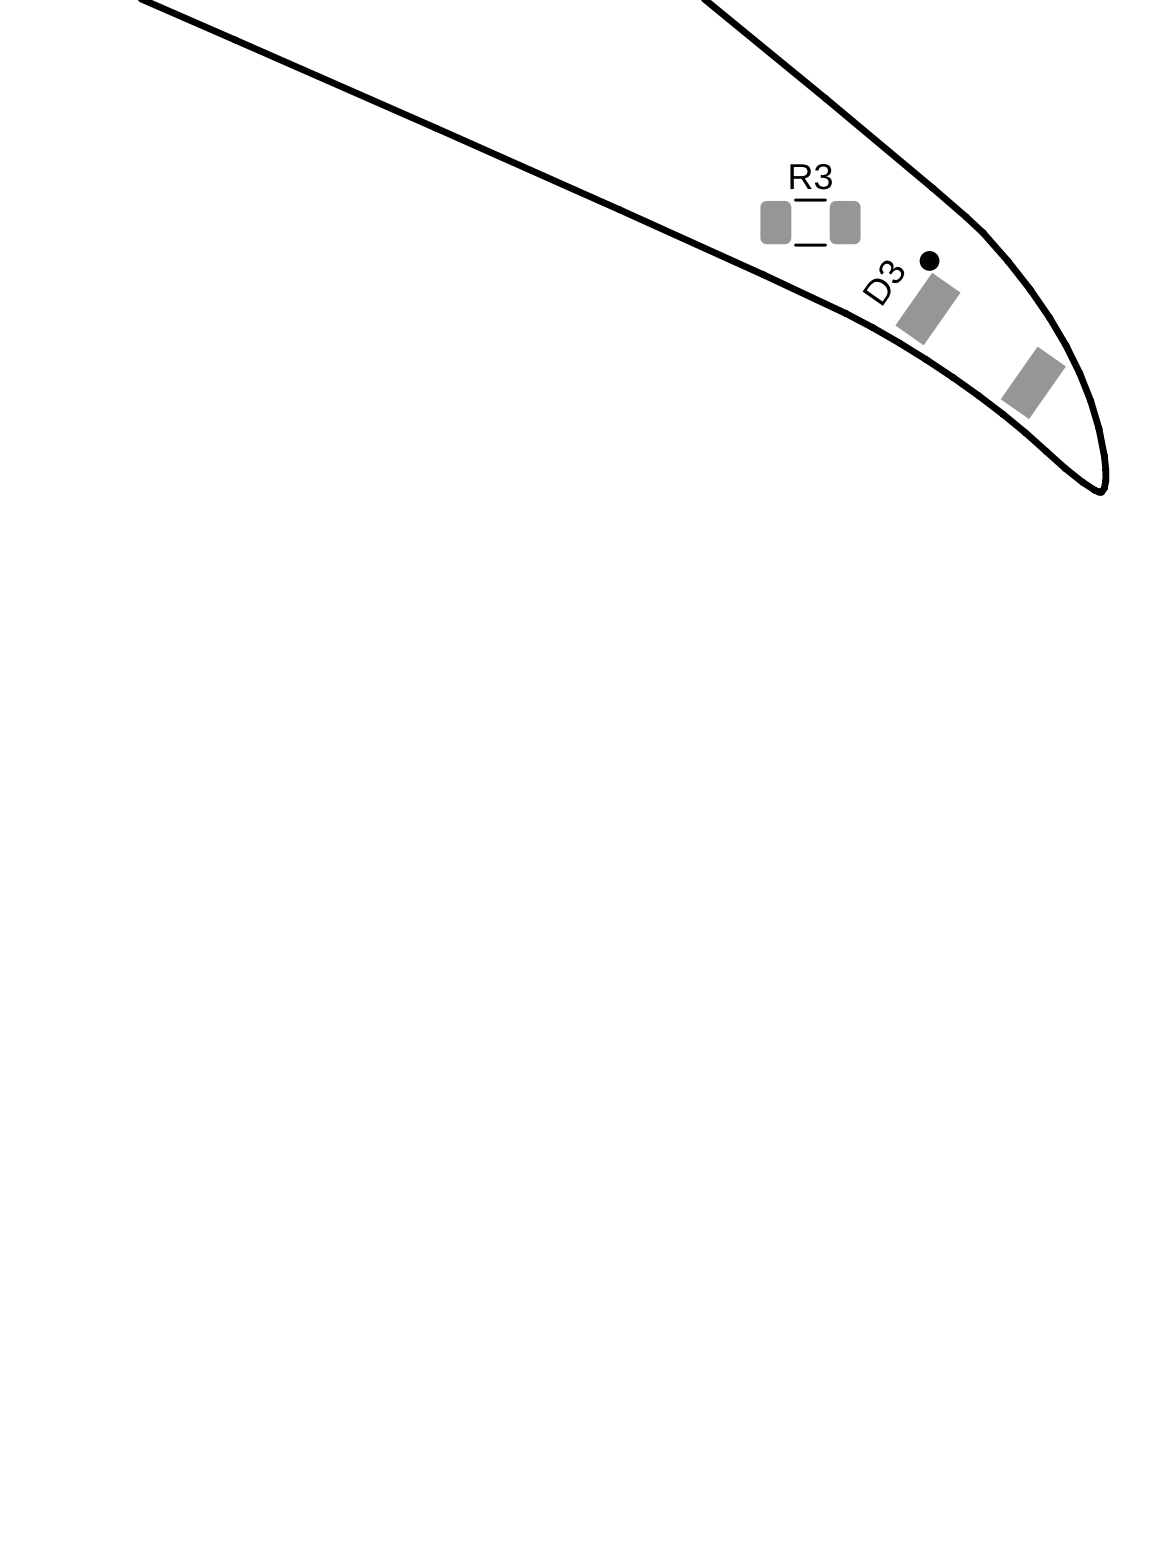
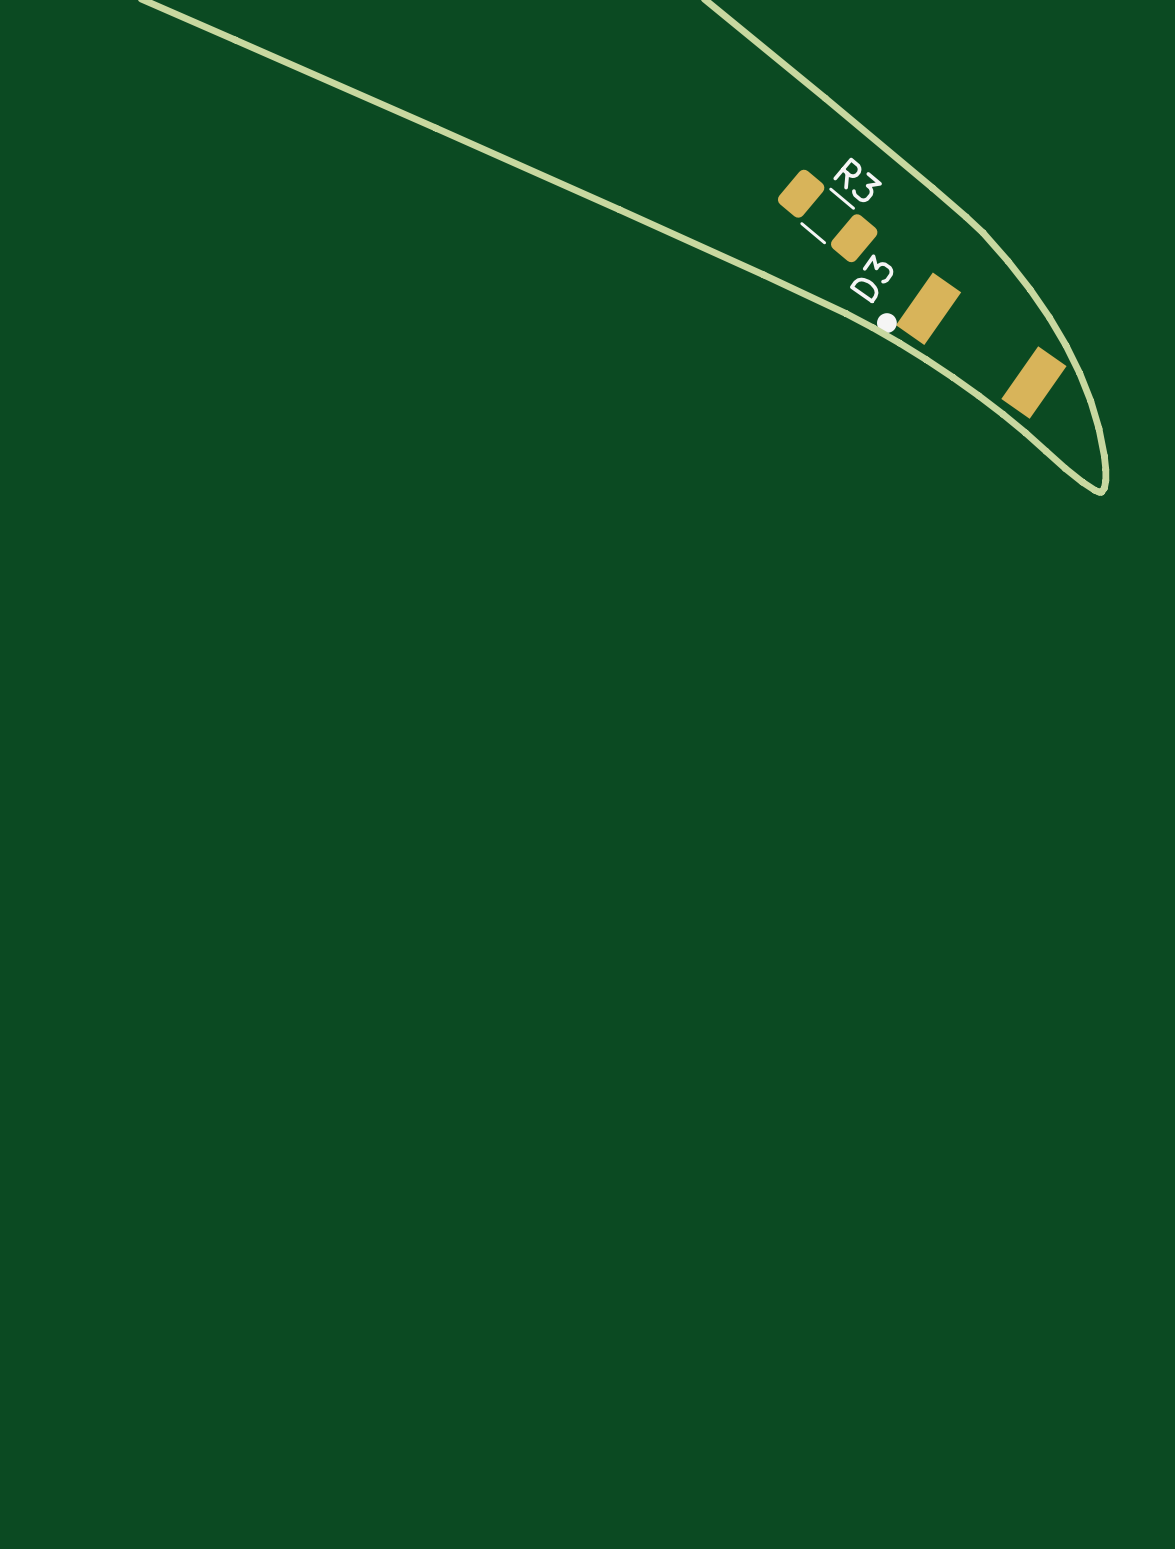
R3 rotation: 0° (810, 222) -> 40° clockwise (827, 215)
D3 footprint: [895, 251, 1066, 420] -> [877, 272, 1067, 419]

